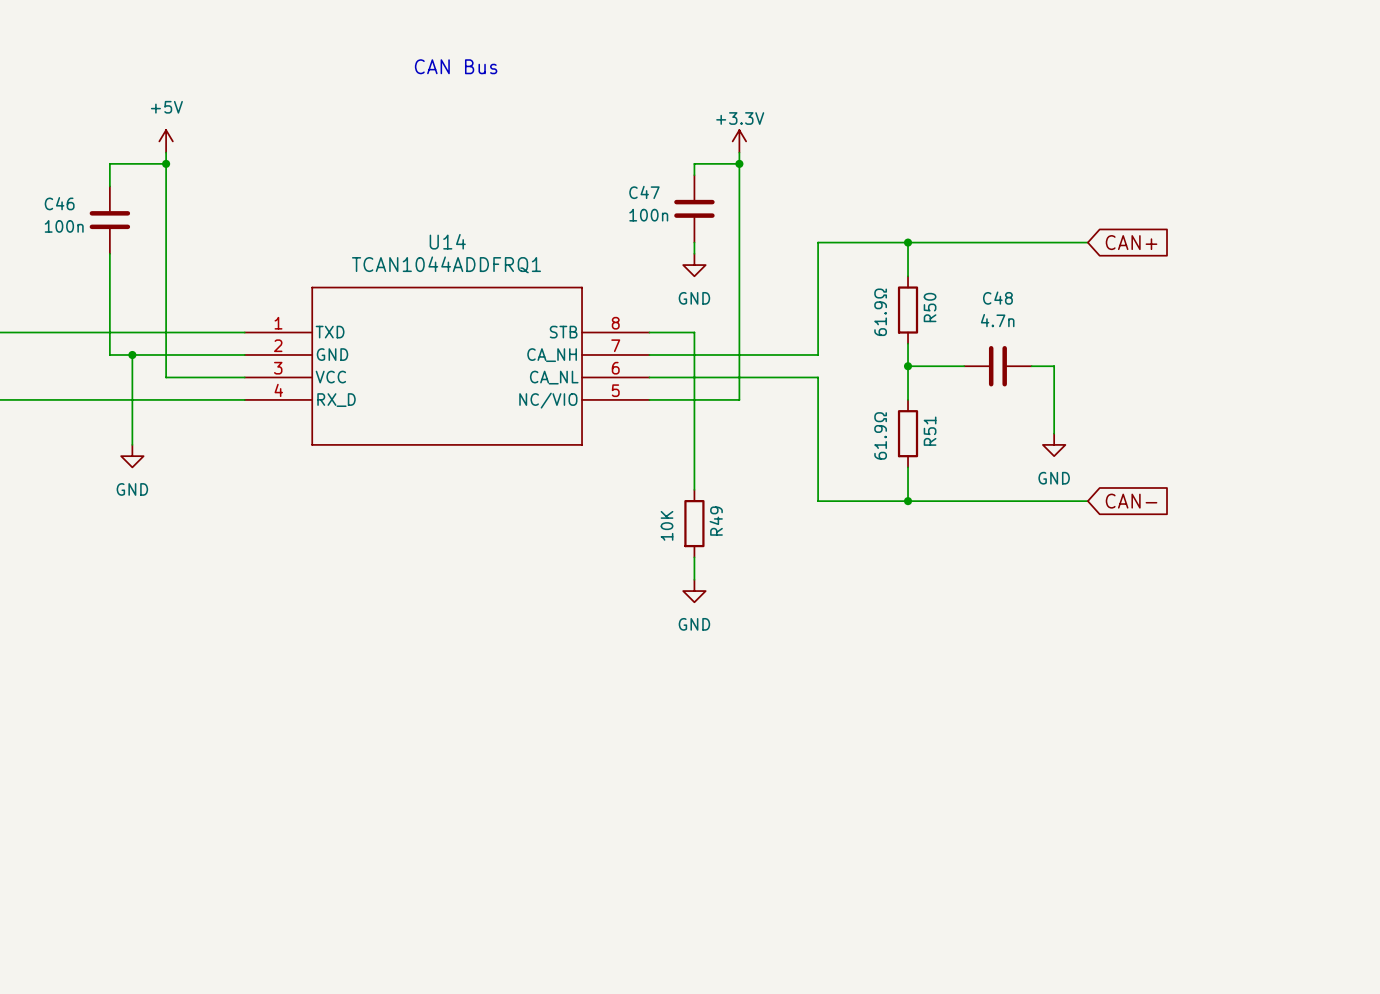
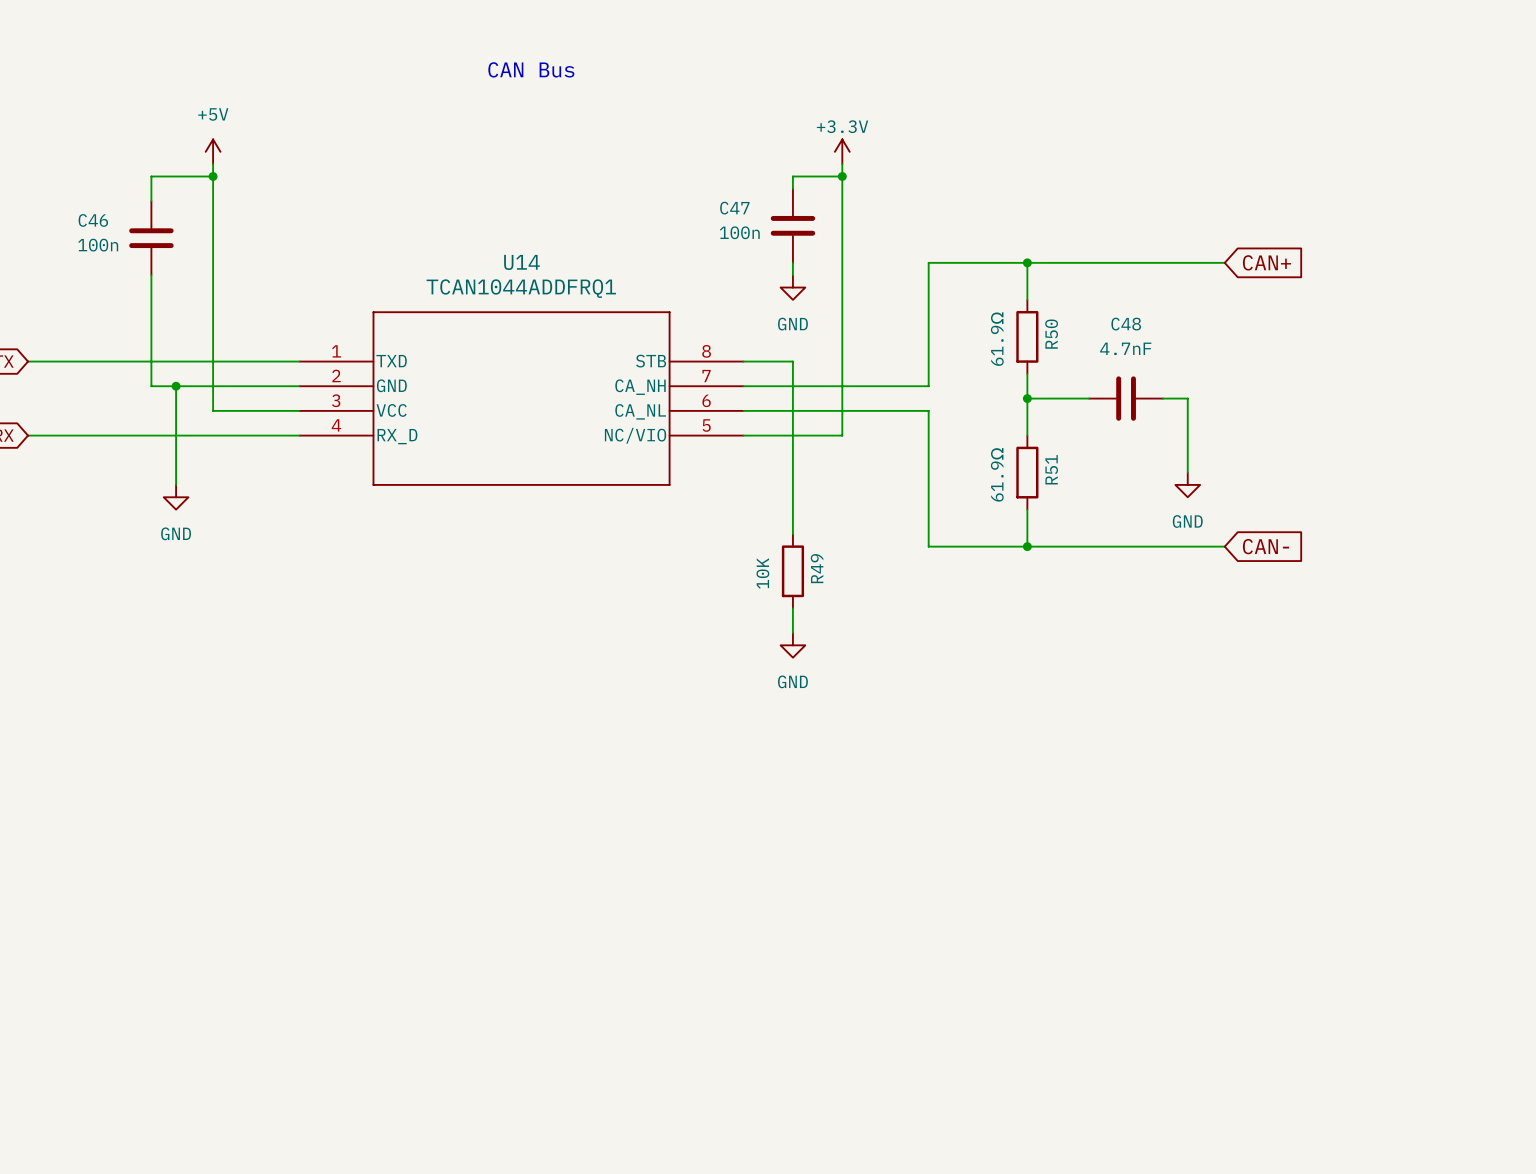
C48 value: 4.7n (997, 320) -> 4.7nF (1125, 348)

